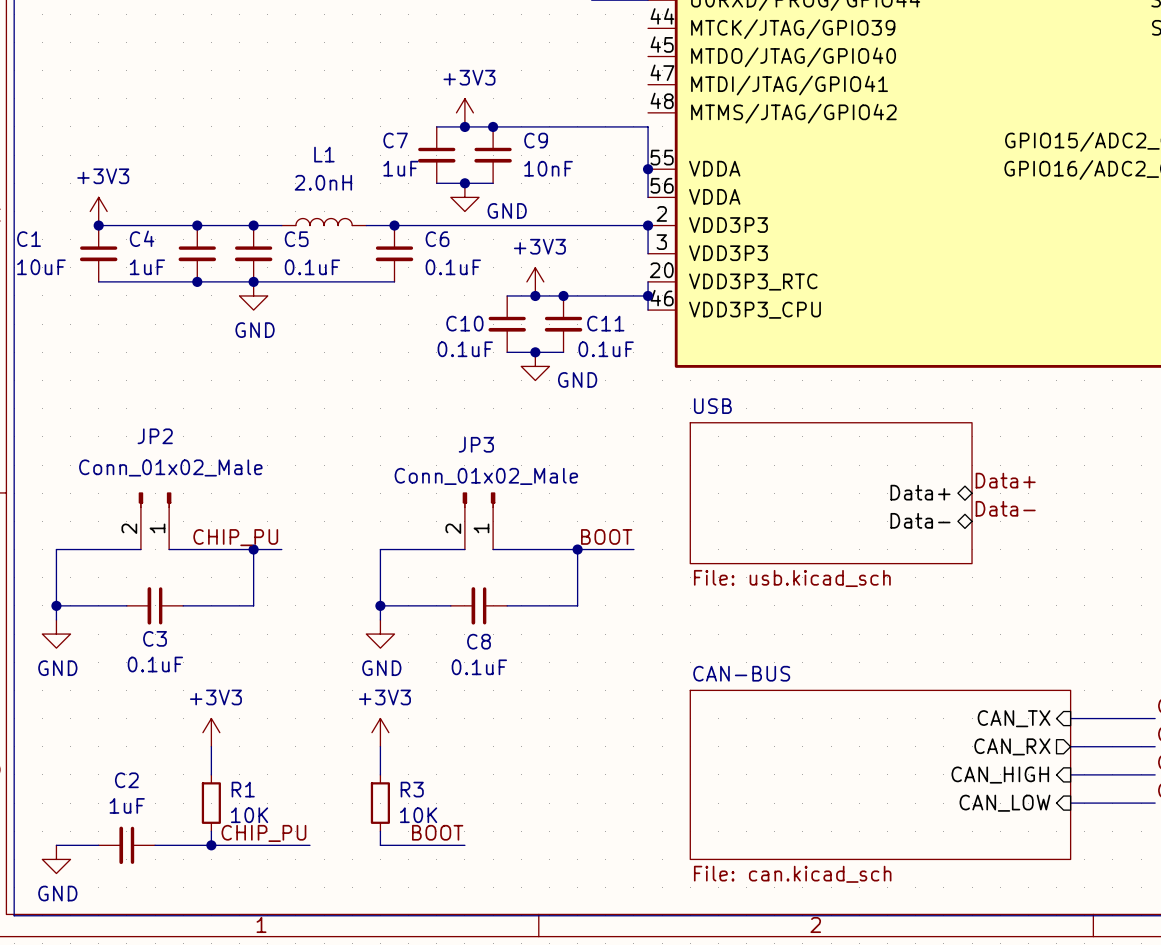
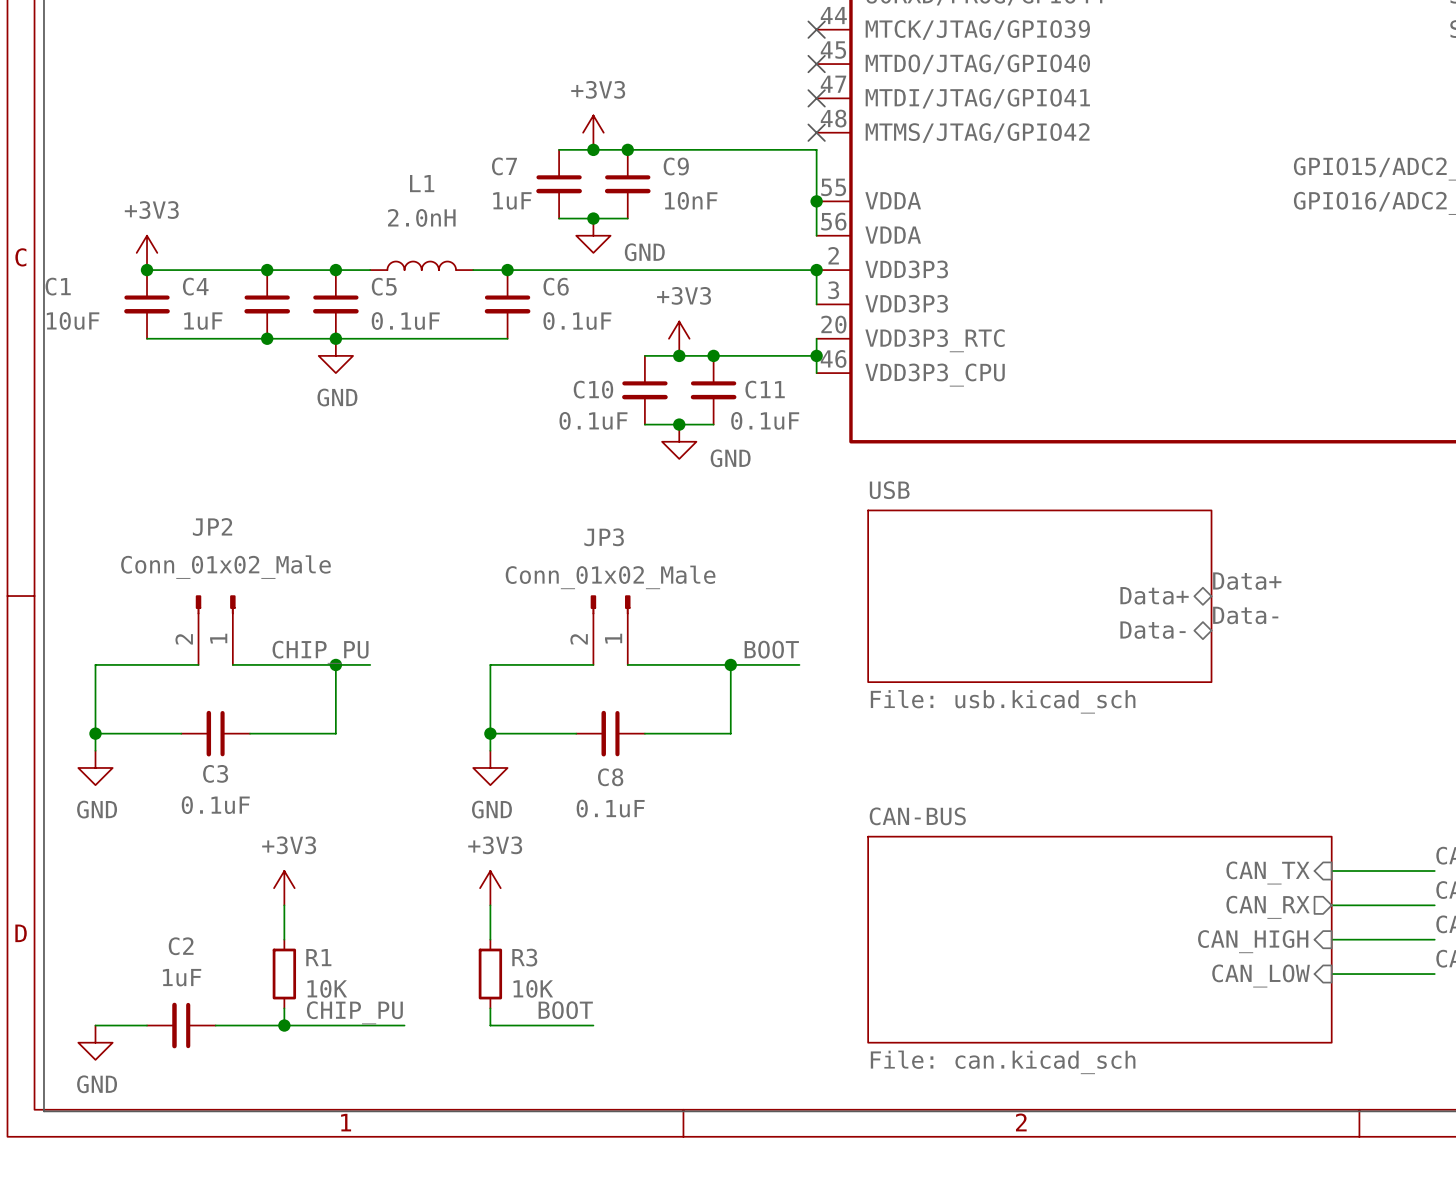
no-connect mark: none -> (816, 29)
no-connect mark: none -> (816, 64)
no-connect mark: none -> (816, 98)
no-connect mark: none -> (816, 132)

